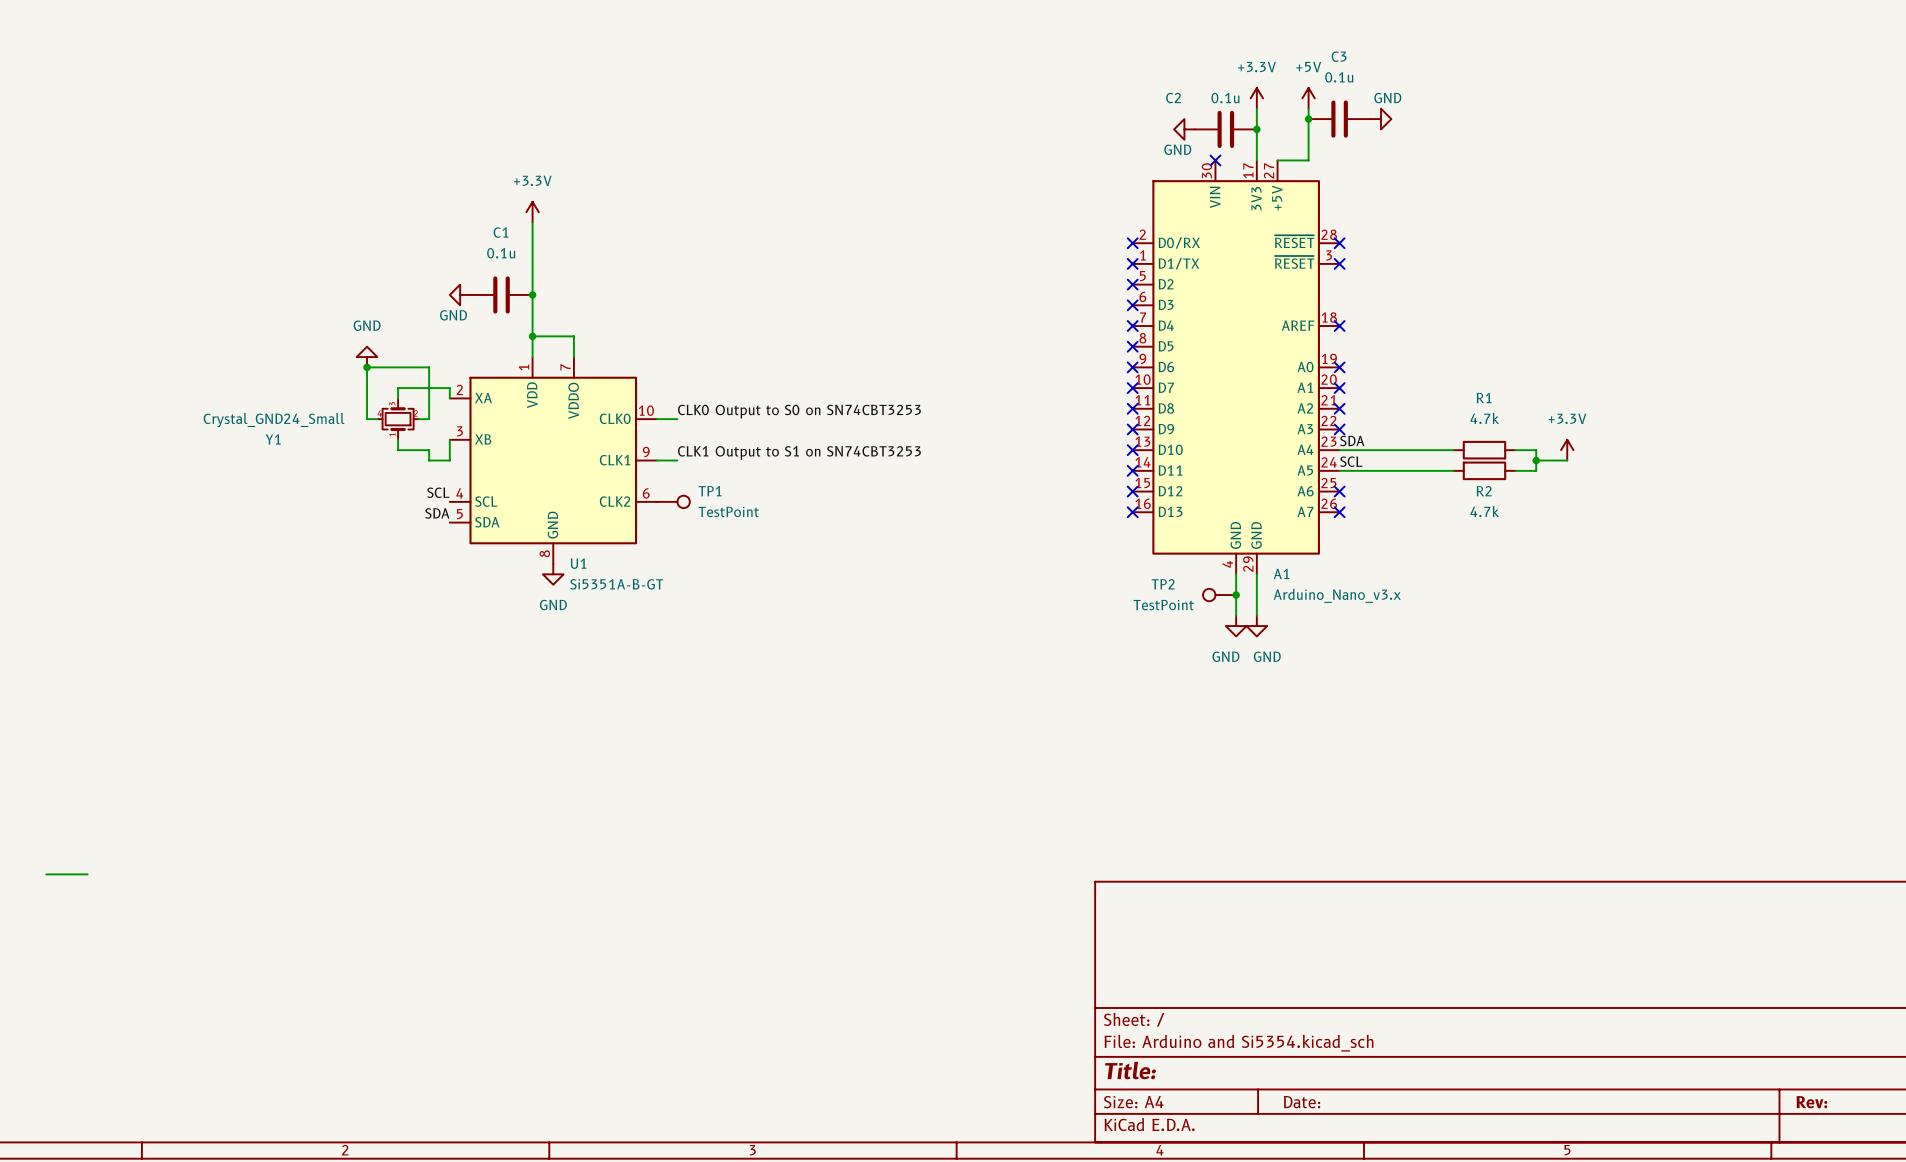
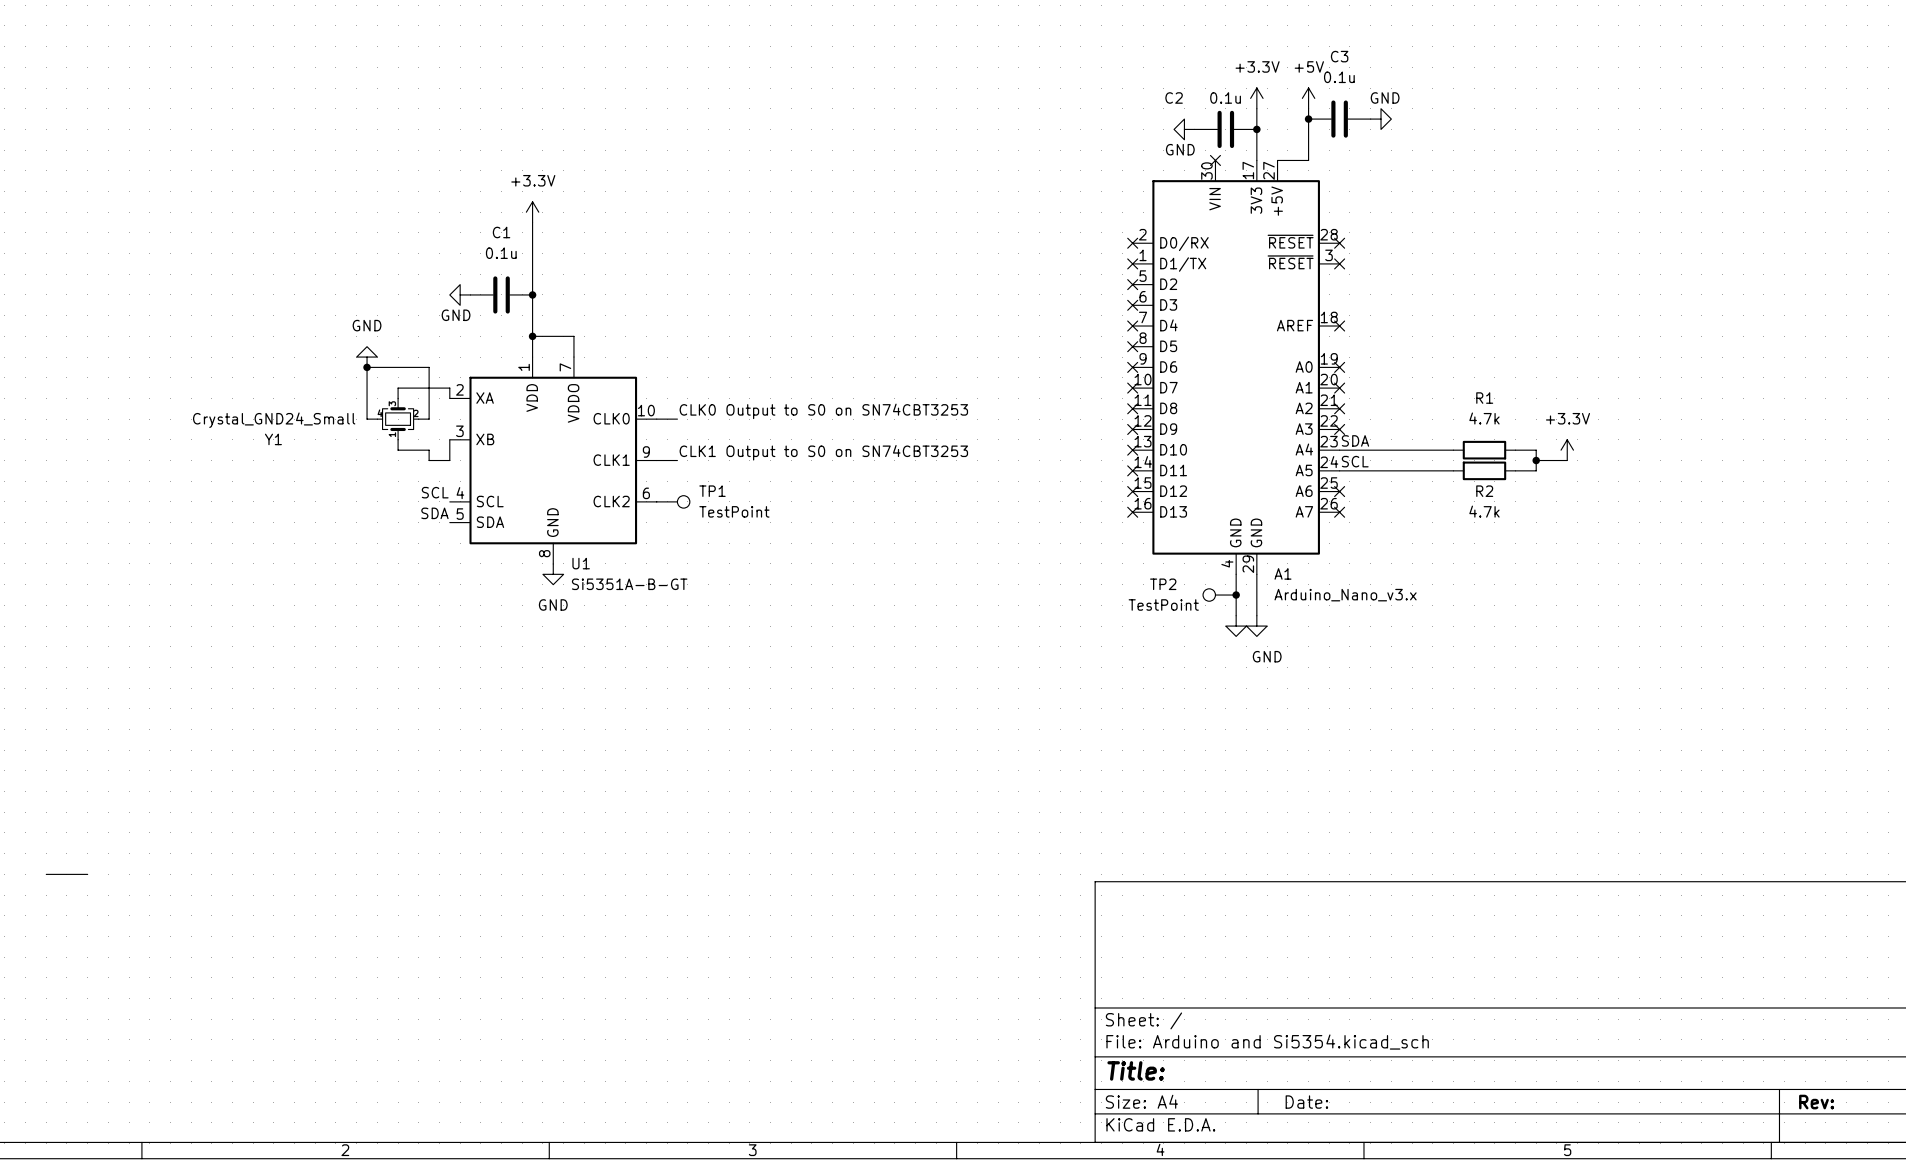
label: CLK1 Output to S1 on SN74CBT3253 (799, 452) -> CLK1 Output to S0 on SN74CBT3253 (823, 452)
power symbol text: GND (1225, 656) -> none

